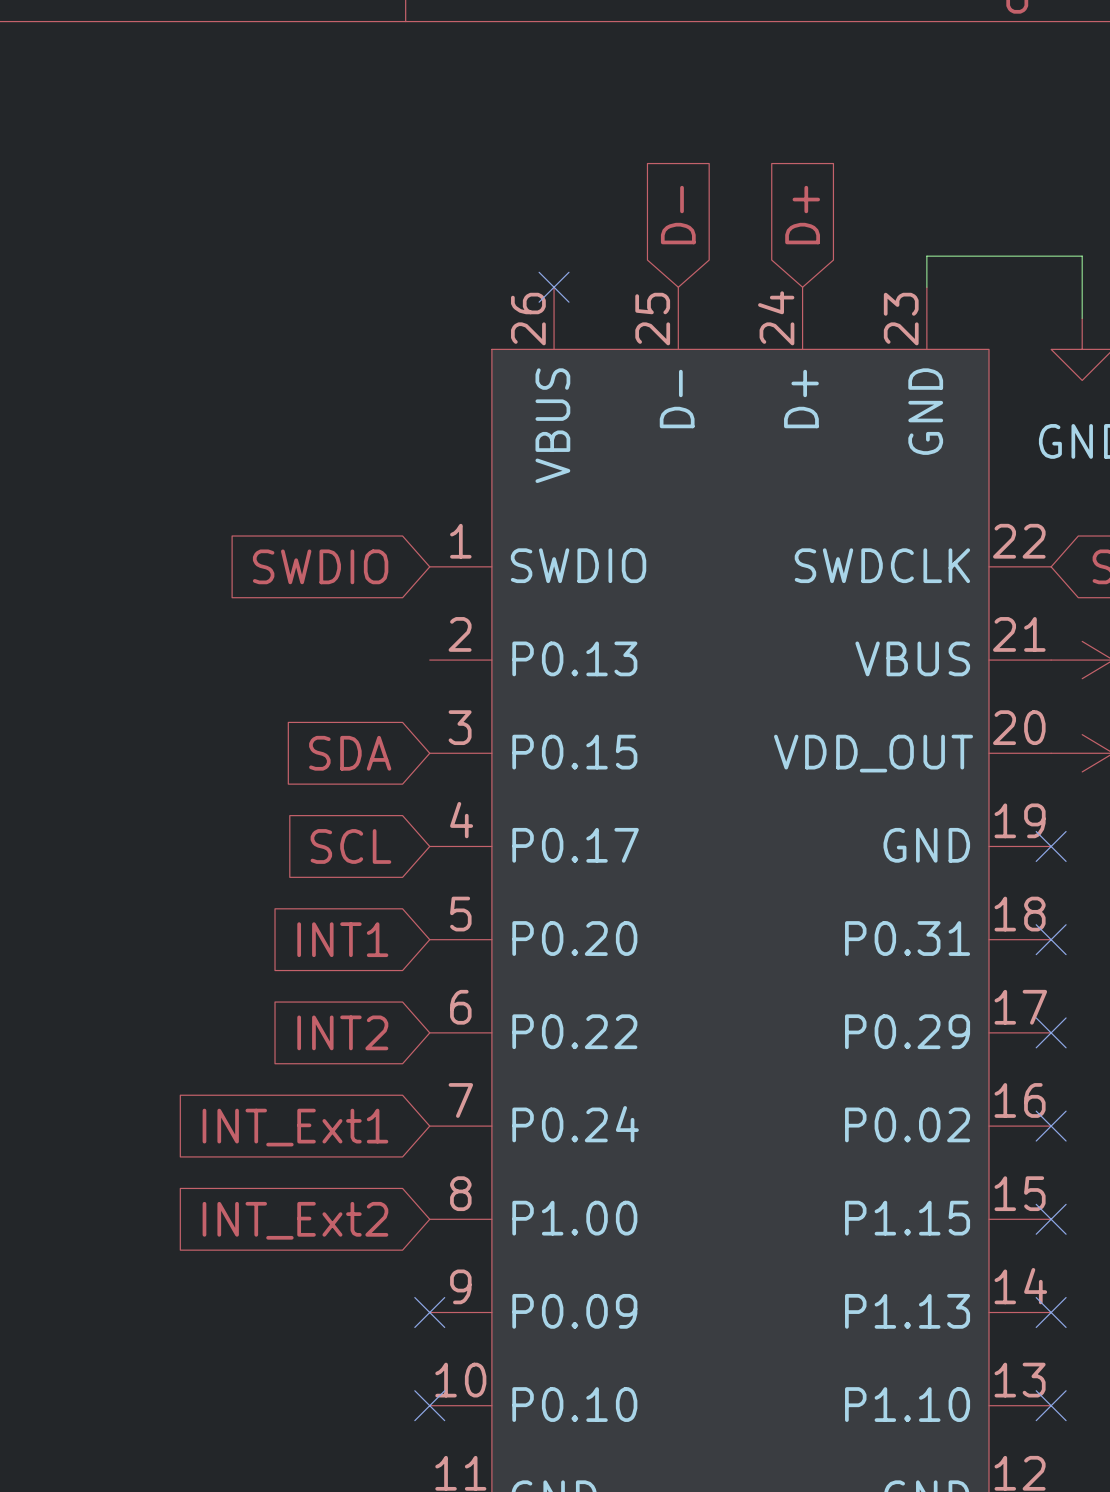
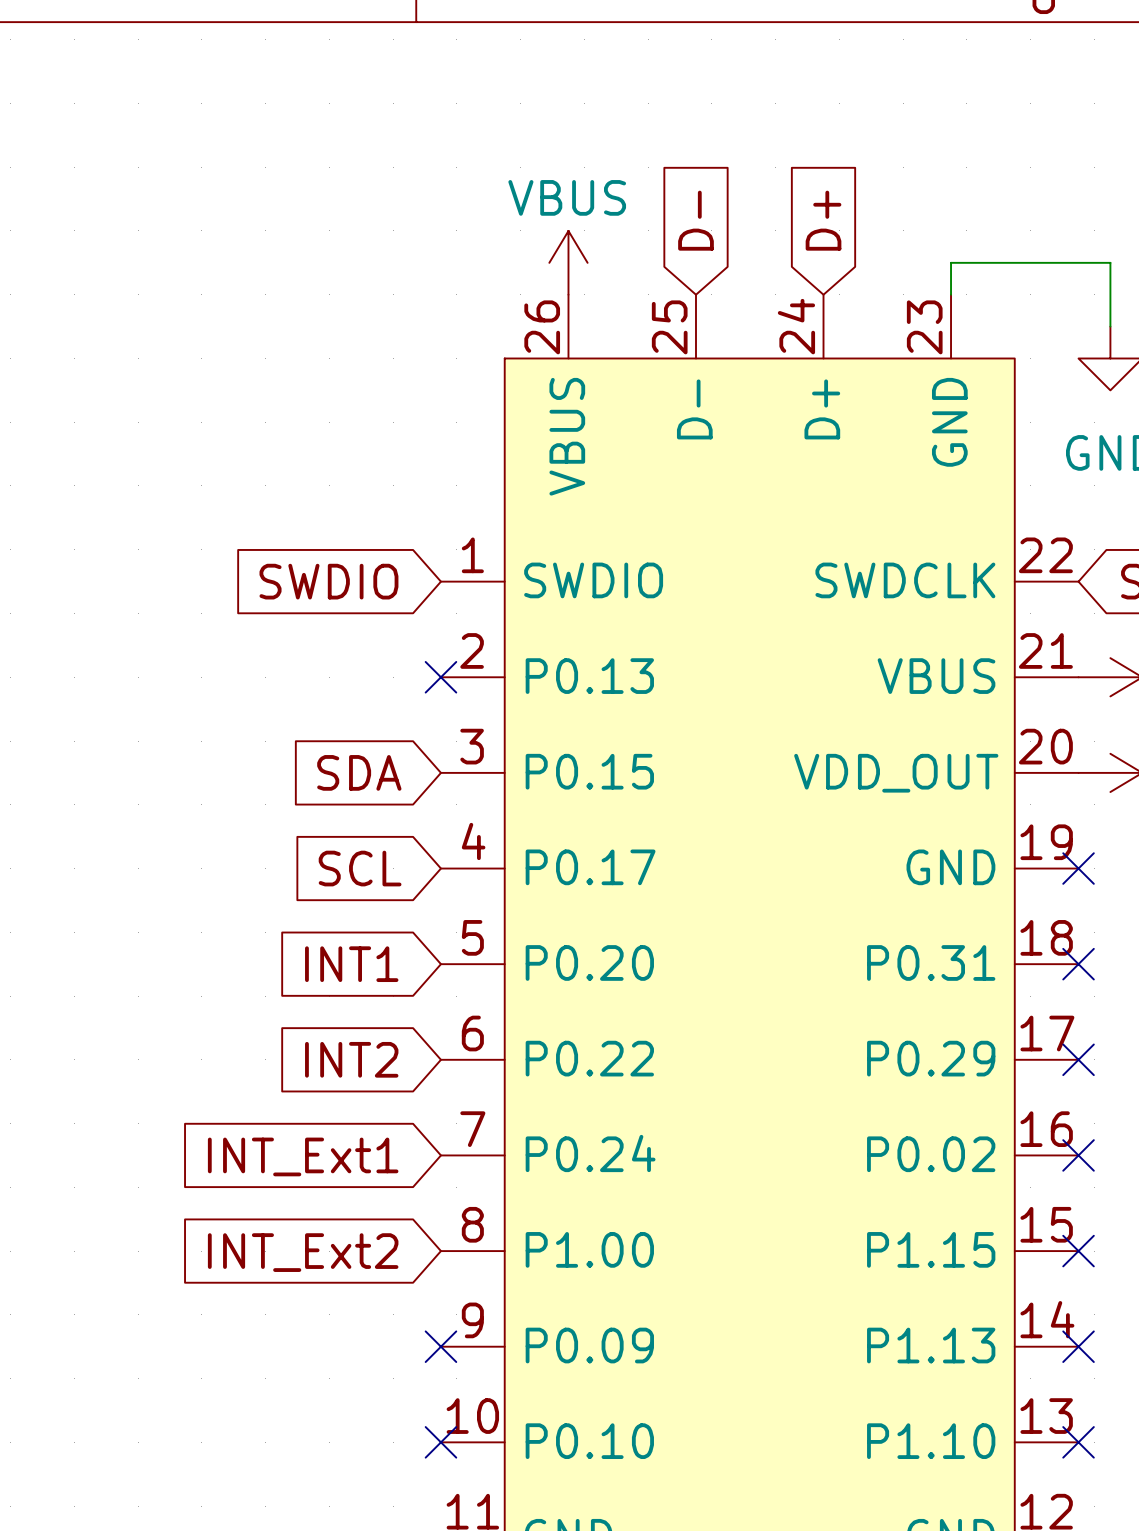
power symbol: none -> VBUS (568, 262)
no-connect mark: (554, 287) -> none
no-connect mark: none -> (440, 677)

